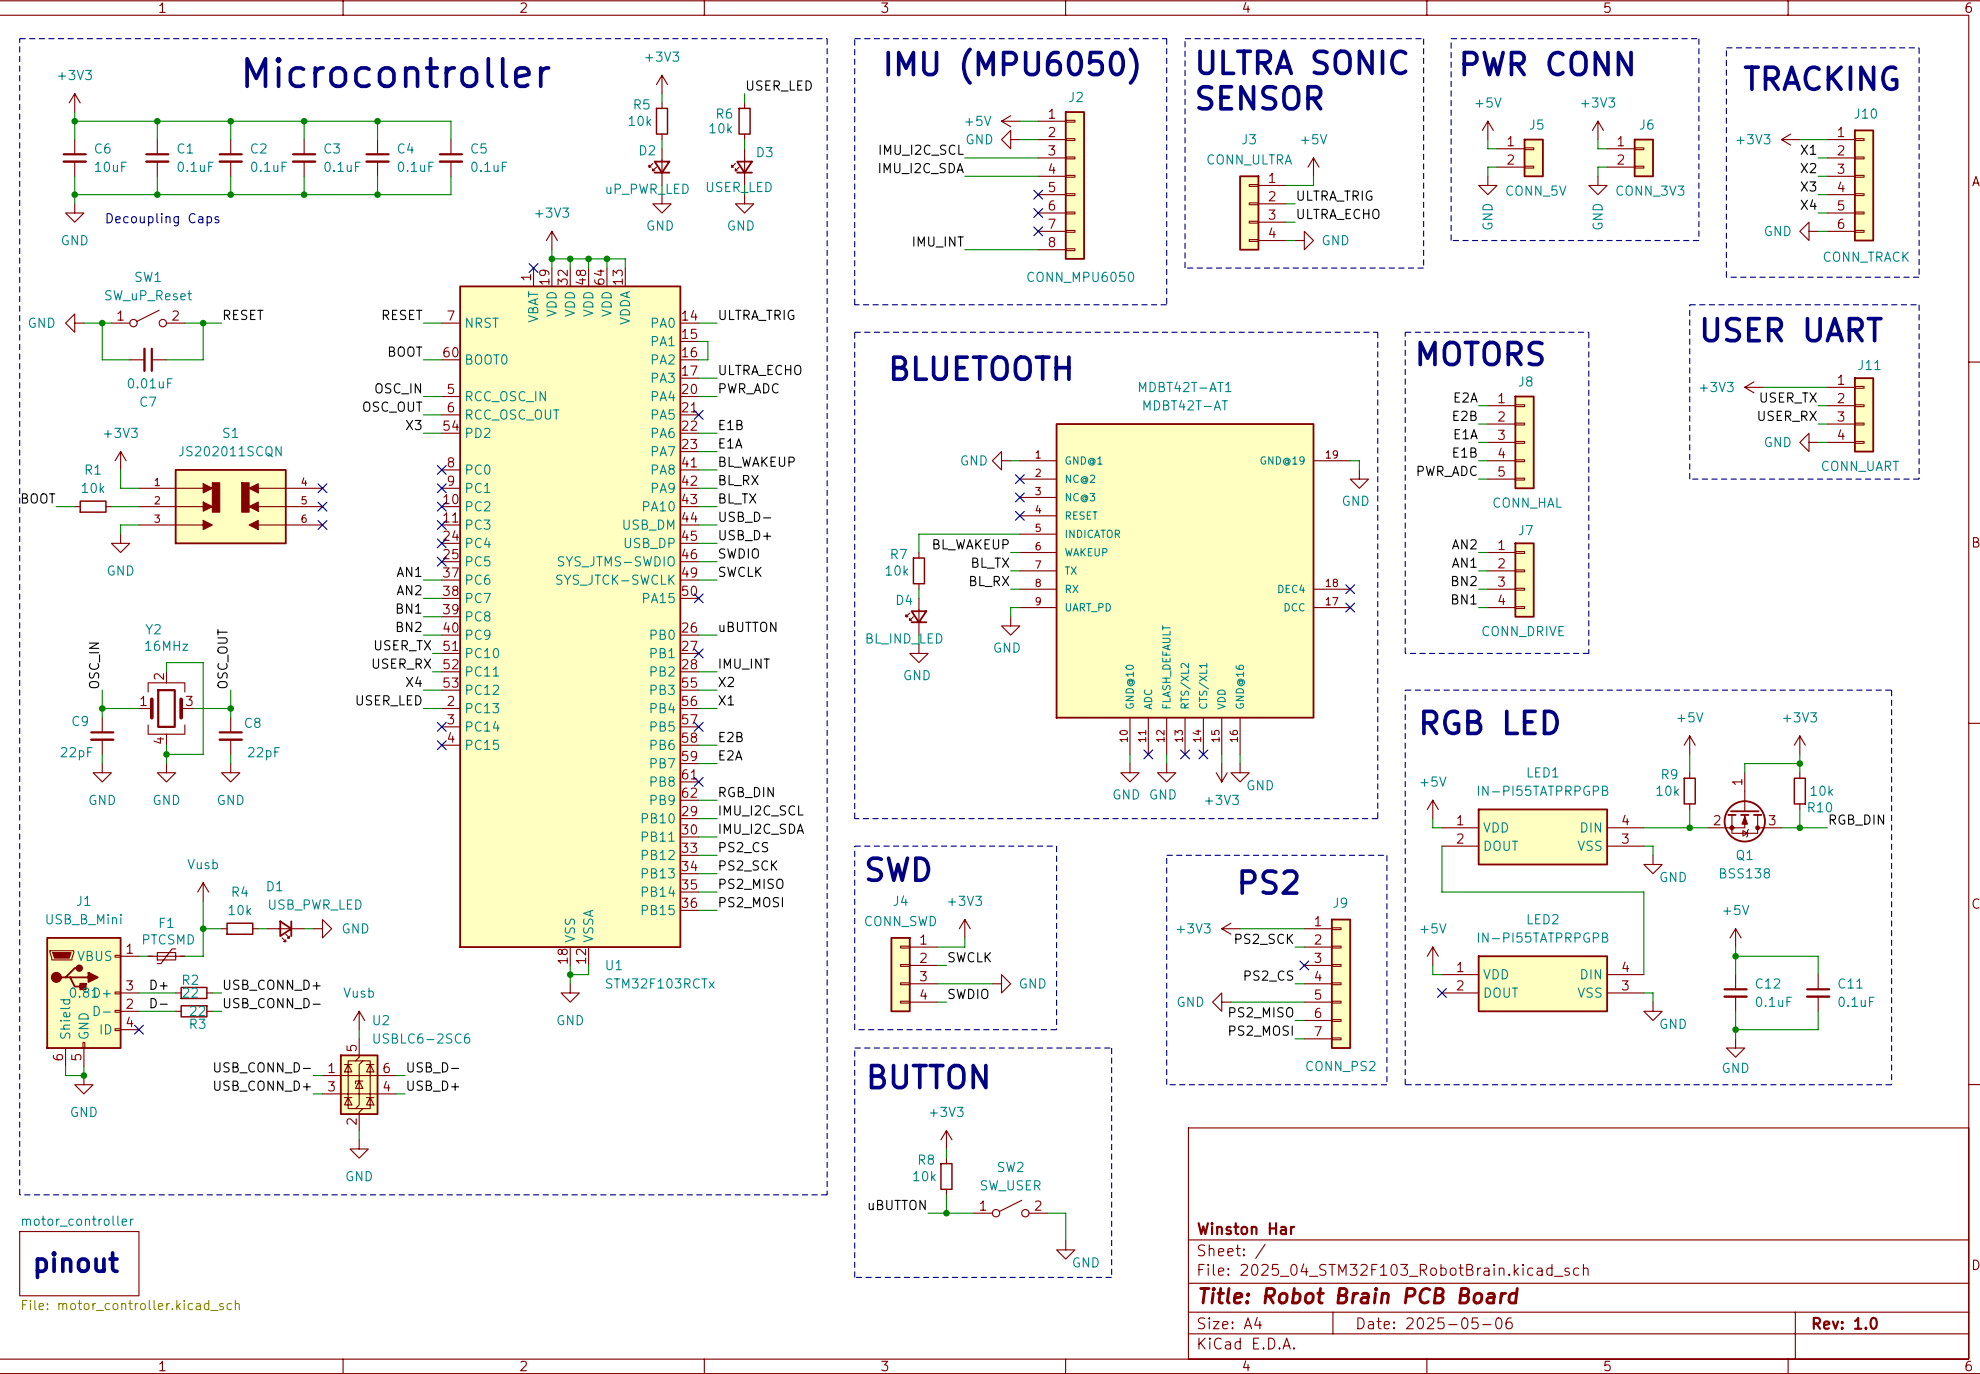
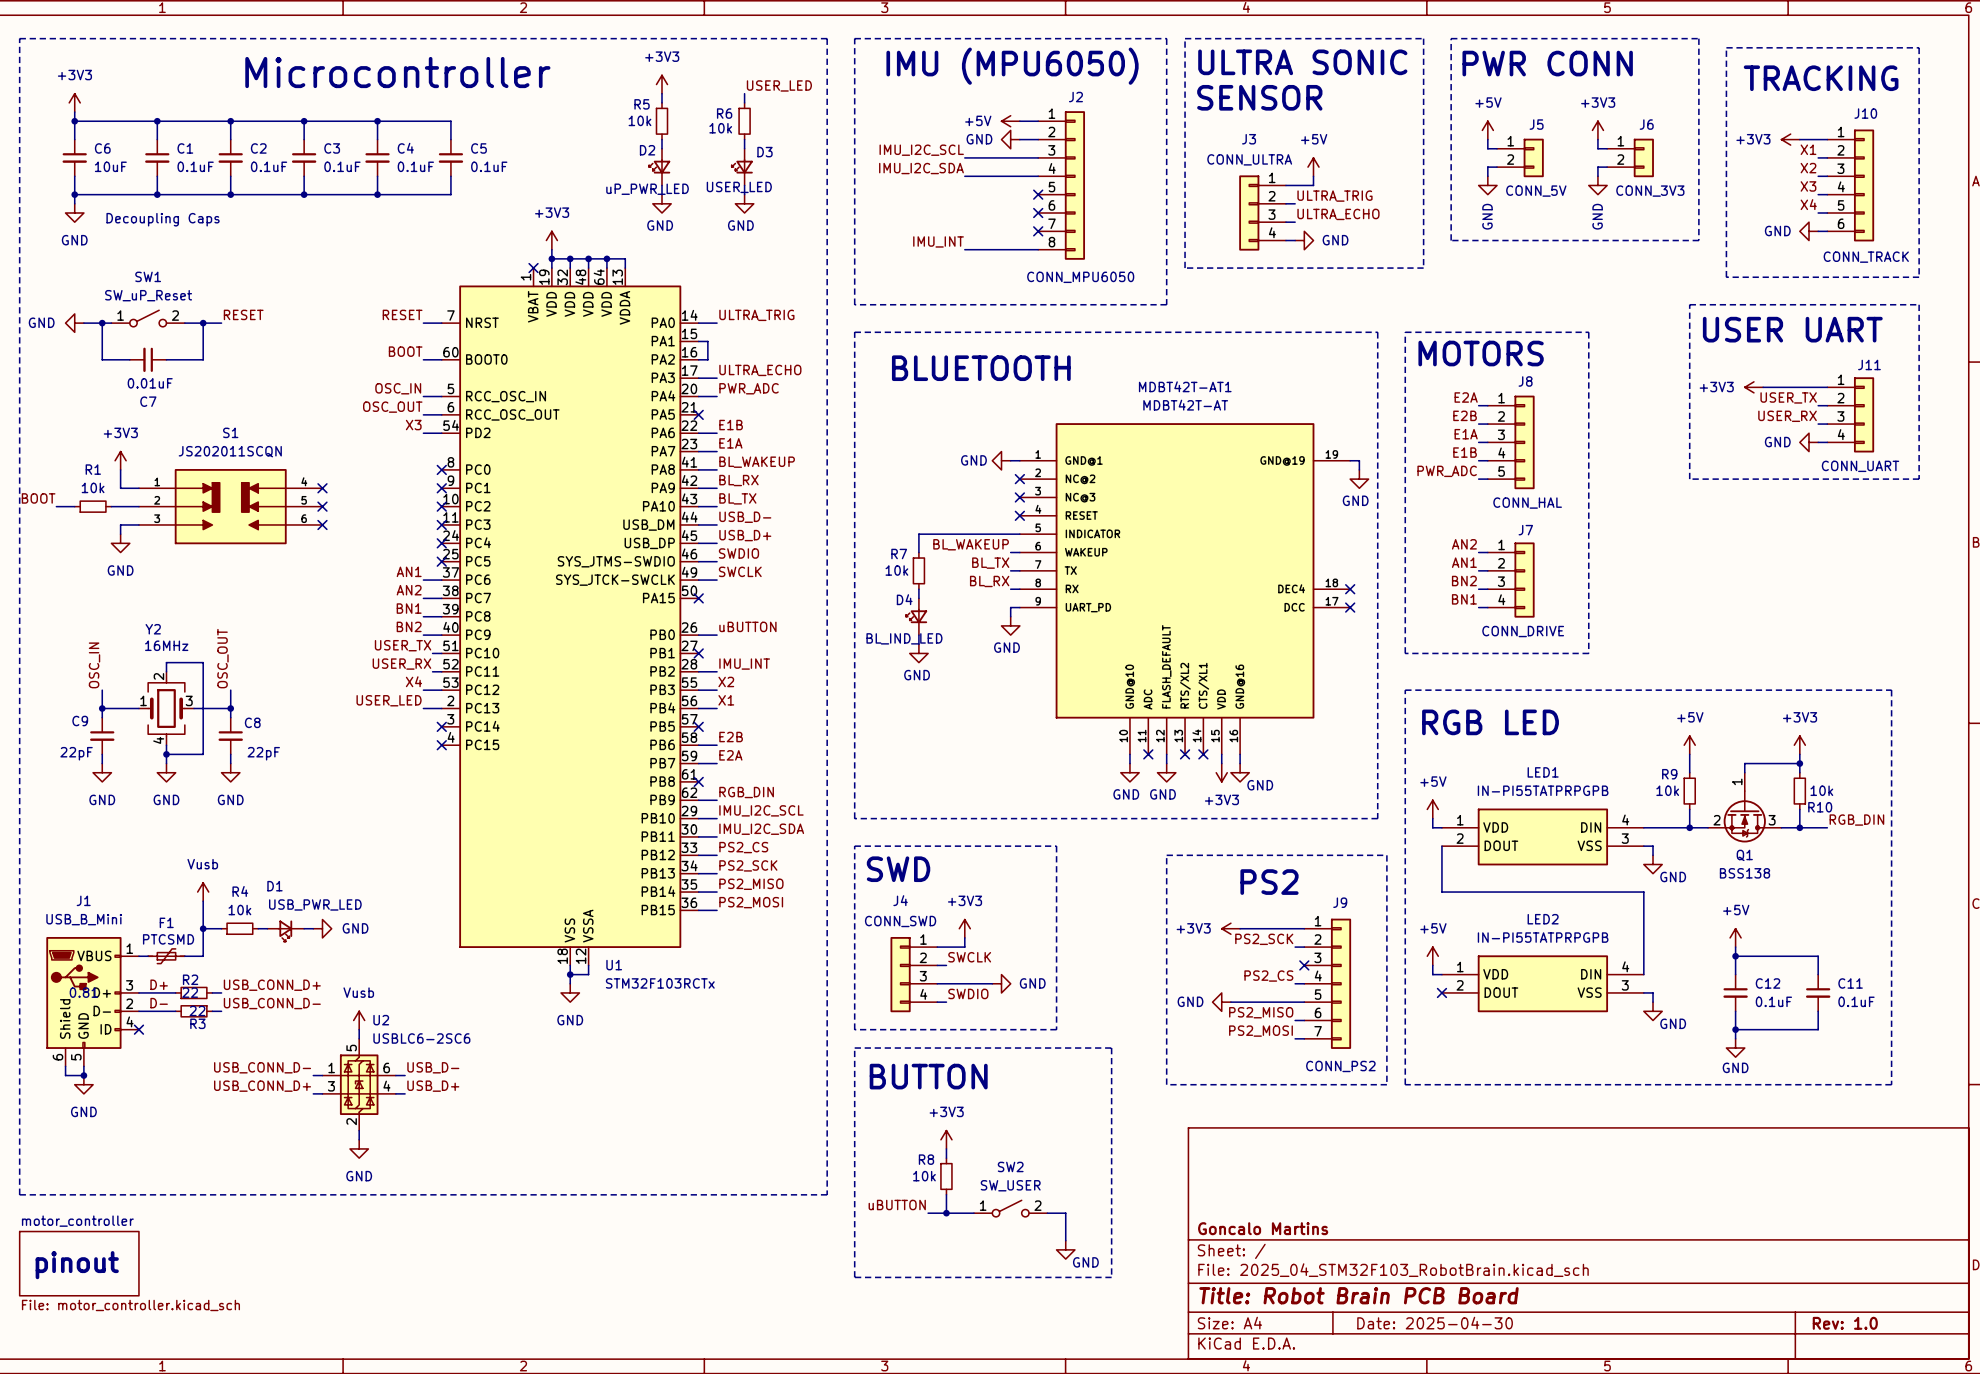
title block: Winston Har (1246, 1228) -> Goncalo Martins (1263, 1228)
title block: Date: 2025-05-06 (1435, 1323) -> Date: 2025-04-30 (1435, 1323)

